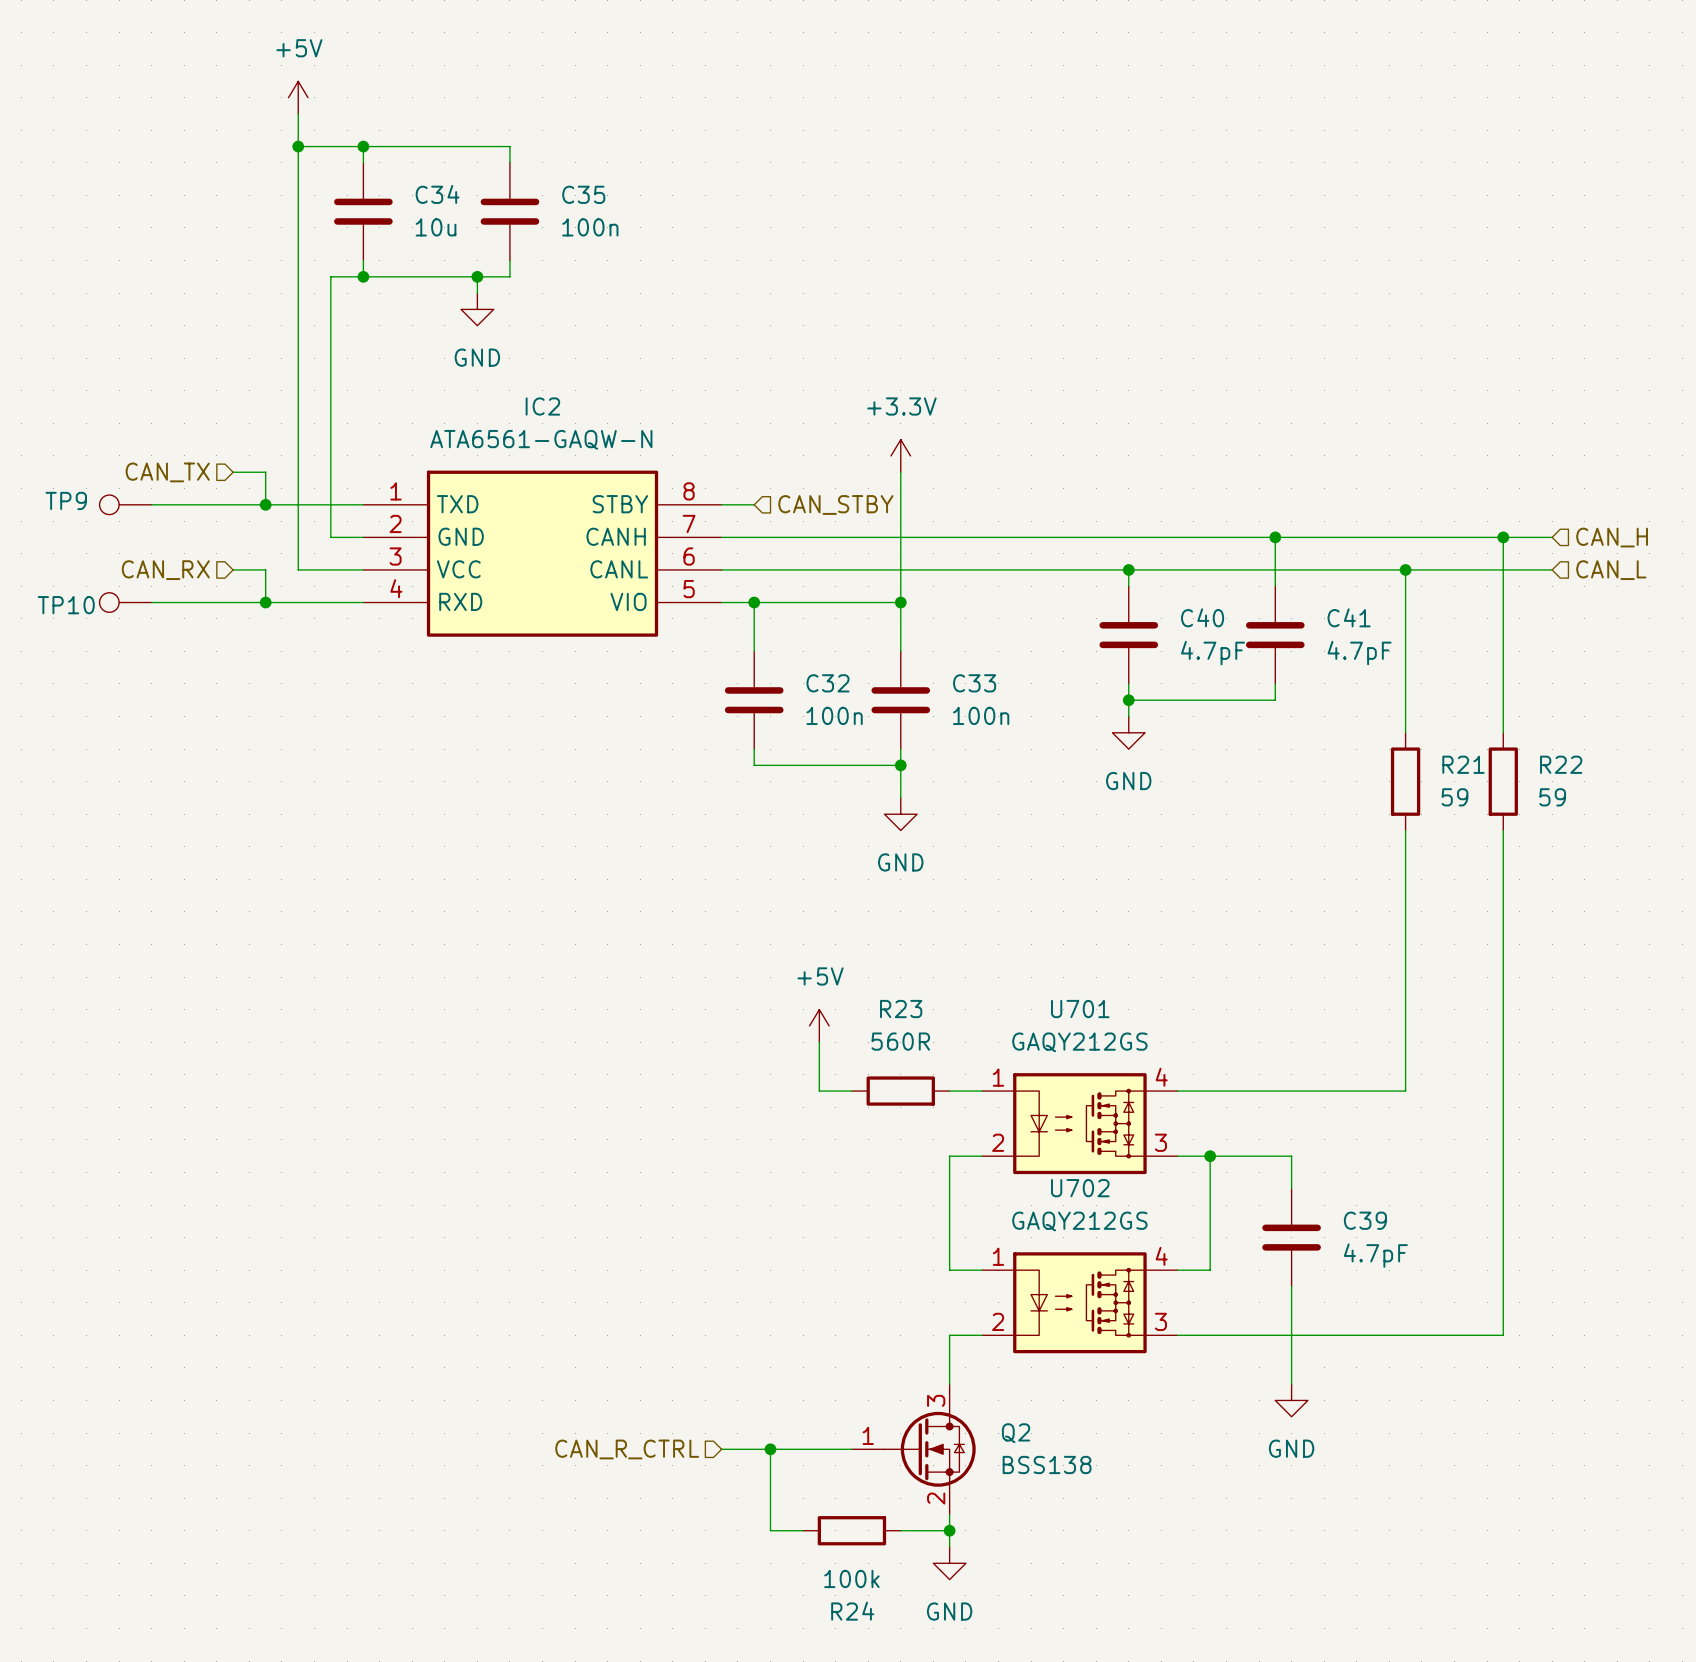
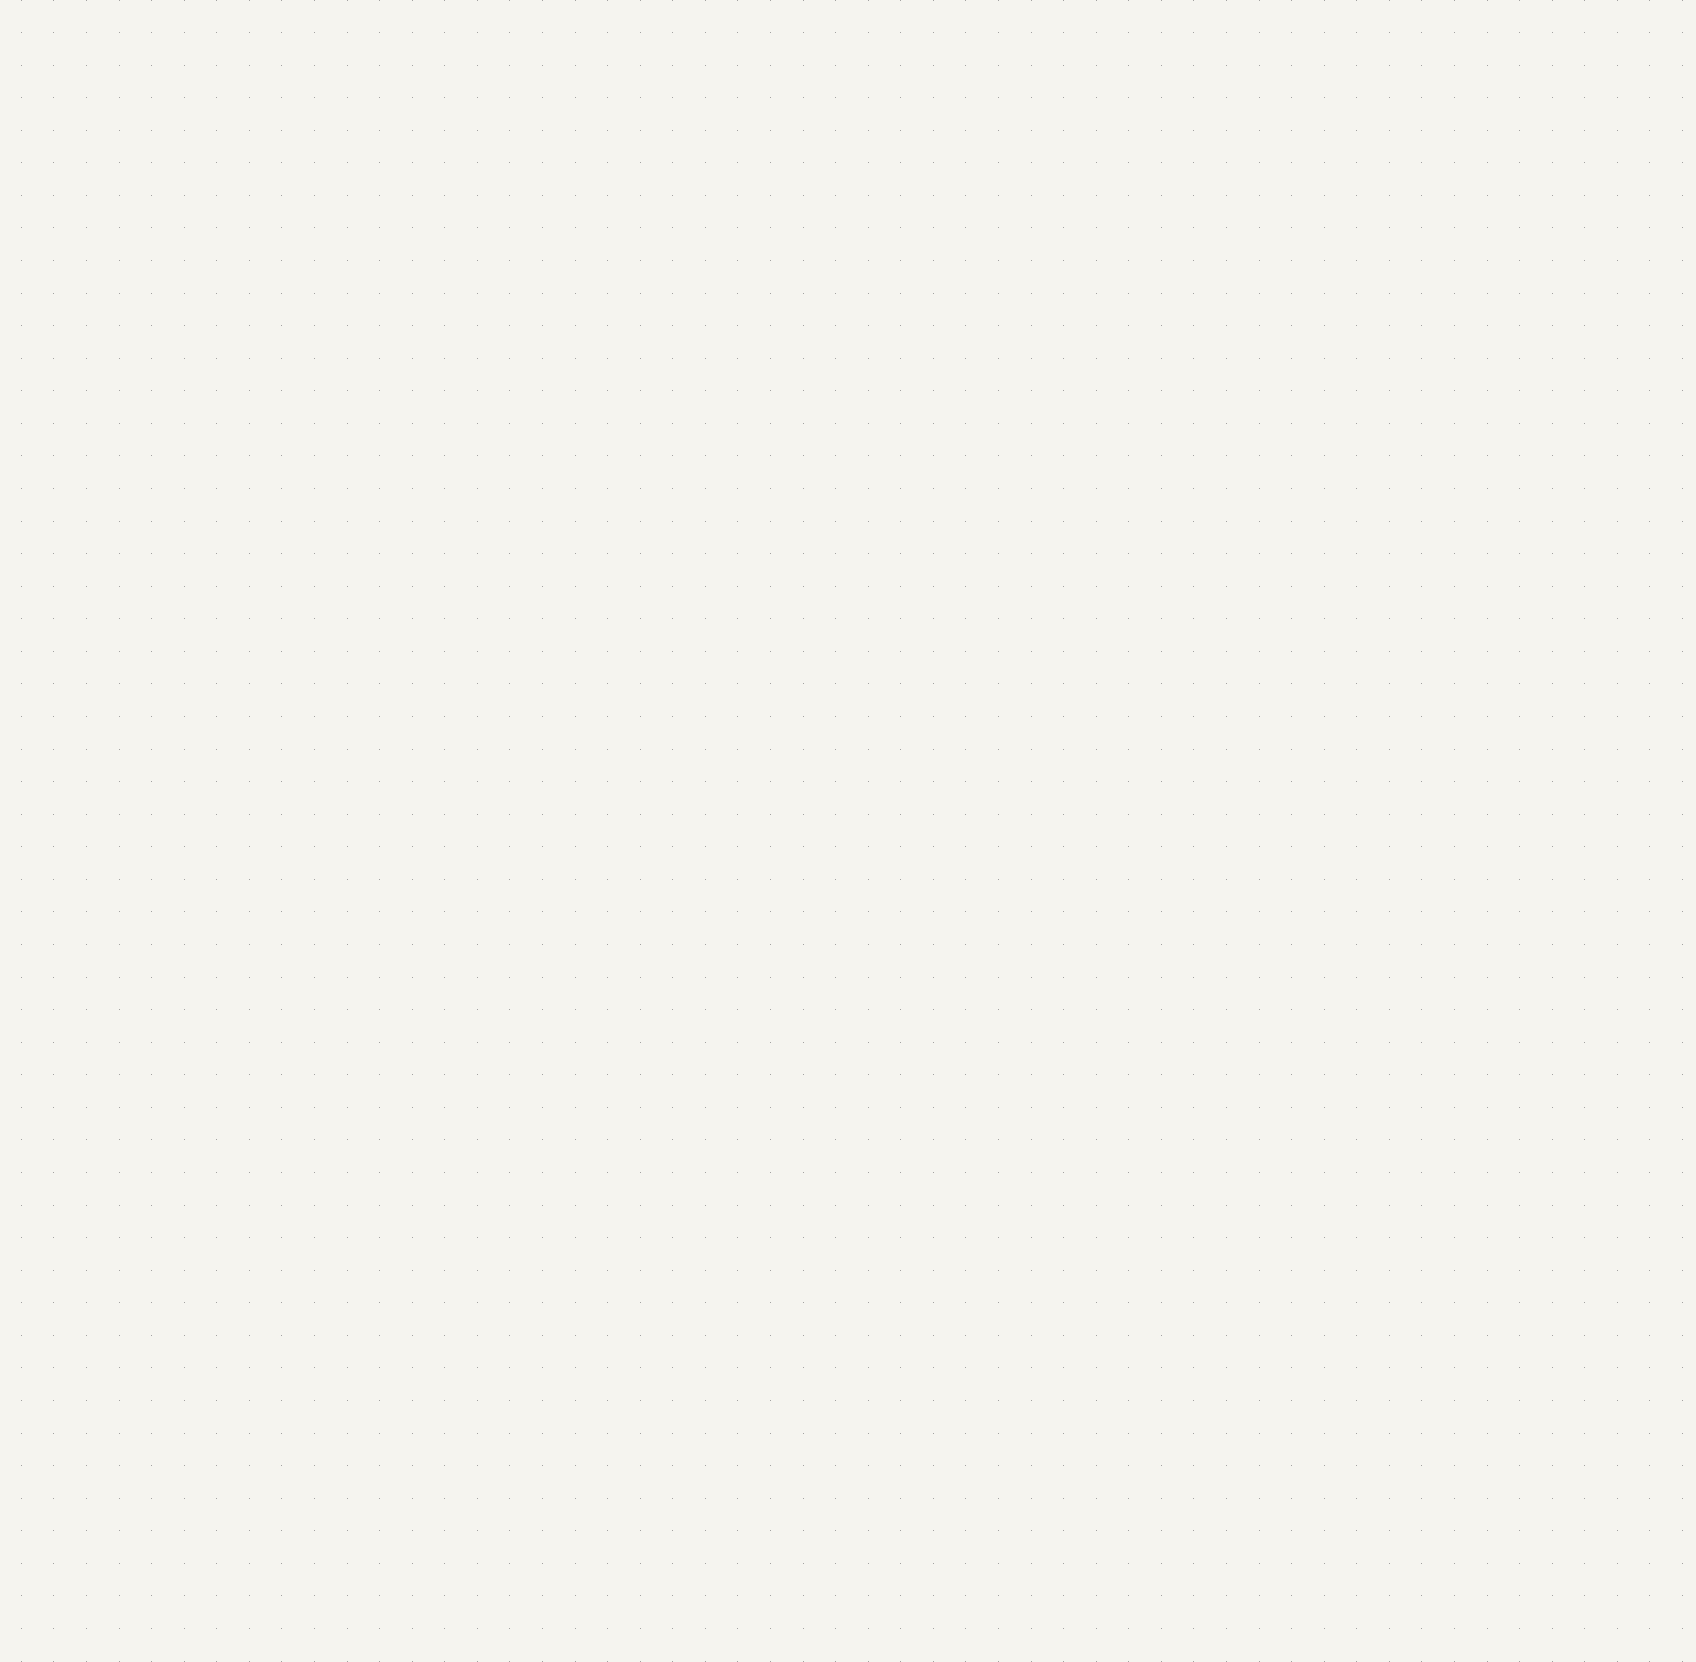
power symbol: +5V (298, 97) -> none
wire: (298, 114) (298, 569) (363, 569) -> none
wire: (298, 146) (509, 146) (509, 162) -> none
junction: (298, 146) -> none
wire: (363, 146) (363, 162) -> none
junction: (363, 146) -> none
C34: 10u (363, 211) -> none
C35: 100n (509, 211) -> none
wire: (363, 260) (363, 276) -> none
wire: (509, 260) (509, 276) (330, 276) (330, 537) (363, 537) -> none
junction: (363, 276) -> none
wire: (477, 276) (477, 293) -> none
junction: (477, 276) -> none
power symbol: GND (477, 309) -> none
power symbol: +3.3V (900, 455) -> none
hierarchical label: CAN_TX (167, 472) -> none
wire: (233, 472) (265, 472) (265, 504) -> none
wire: (900, 472) (900, 651) -> none
TP9: (125, 504) -> none
wire: (151, 504) (363, 504) -> none
junction: (265, 504) -> none
wire: (721, 504) (754, 504) -> none
hierarchical label: CAN_STBY (835, 504) -> none
wire: (721, 537) (1552, 537) -> none
wire: (1275, 537) (1275, 586) -> none
junction: (1275, 537) -> none
wire: (1503, 537) (1503, 732) -> none
junction: (1503, 537) -> none
hierarchical label: CAN_H (1612, 537) -> none
IC2: ATA6561-GAQW-N (542, 553) -> none
wire: (233, 569) (265, 569) (265, 602) -> none
wire: (721, 569) (1552, 569) -> none
wire: (1128, 569) (1128, 586) -> none
junction: (1128, 569) -> none
wire: (1405, 569) (1405, 732) -> none
junction: (1405, 569) -> none
hierarchical label: CAN_RX (165, 570) -> none
hierarchical label: CAN_L (1611, 570) -> none
TP10: (125, 602) -> none
wire: (151, 602) (363, 602) -> none
junction: (265, 602) -> none
wire: (721, 602) (900, 602) -> none
wire: (754, 602) (754, 651) -> none
junction: (754, 602) -> none
junction: (900, 602) -> none
C40: 4.7pF (1128, 635) -> none
C41: 4.7pF (1275, 635) -> none
wire: (1128, 683) (1128, 716) -> none
wire: (1275, 683) (1275, 700) (1128, 700) -> none
C32: 100n (754, 700) -> none
C33: 100n (900, 700) -> none
junction: (1128, 700) -> none
power symbol: GND (1128, 732) -> none
wire: (754, 749) (754, 765) (900, 765) -> none
wire: (900, 749) (900, 797) -> none
junction: (900, 765) -> none
R21: 59 (1405, 781) -> none
R22: 59 (1503, 781) -> none
power symbol: GND (900, 814) -> none
wire: (1405, 830) (1405, 1091) (1177, 1091) -> none
wire: (1503, 830) (1503, 1335) (1177, 1335) -> none
power symbol: +5V (819, 1025) -> none
wire: (819, 1042) (819, 1091) (851, 1091) -> none
R23: 560R (900, 1091) -> none
wire: (949, 1091) (982, 1091) -> none
U701: GAQY212GS (1079, 1123) -> none
wire: (982, 1156) (949, 1156) (949, 1270) (982, 1270) -> none
wire: (1177, 1156) (1291, 1156) (1291, 1188) -> none
wire: (1210, 1156) (1210, 1270) (1177, 1270) -> none
junction: (1210, 1156) -> none
C39: 4.7pF (1291, 1237) -> none
wire: (1291, 1286) (1291, 1384) -> none
U702: GAQY212GS (1079, 1302) -> none
wire: (982, 1335) (949, 1335) (949, 1384) -> none
power symbol: GND (1291, 1400) -> none
hierarchical label: CAN_R_CTRL (627, 1449) -> none
wire: (721, 1449) (851, 1449) -> none
wire: (770, 1449) (770, 1530) (803, 1530) -> none
junction: (770, 1449) -> none
Q2: BSS138 (913, 1449) -> none
wire: (949, 1514) (949, 1547) -> none
R24: 100k (851, 1530) -> none
wire: (900, 1530) (949, 1530) -> none
junction: (949, 1530) -> none
power symbol: GND (949, 1563) -> none

